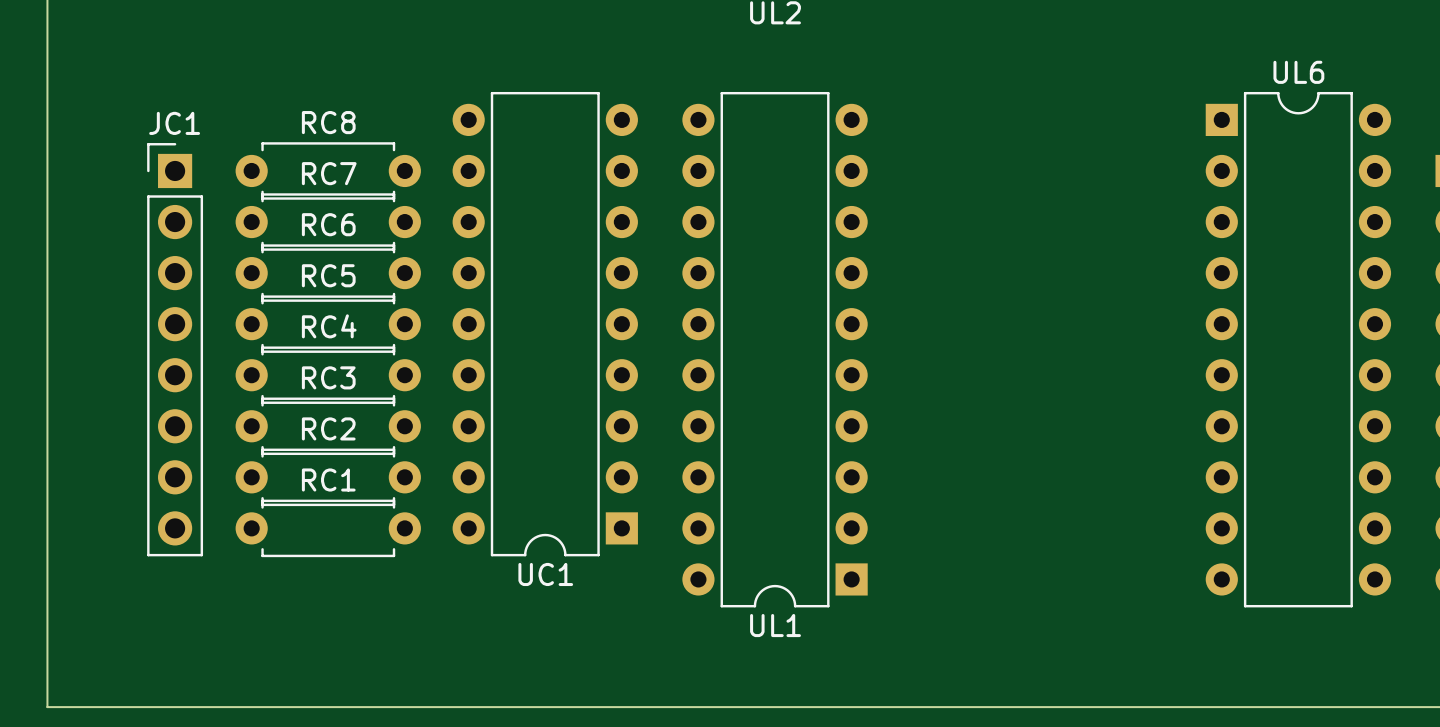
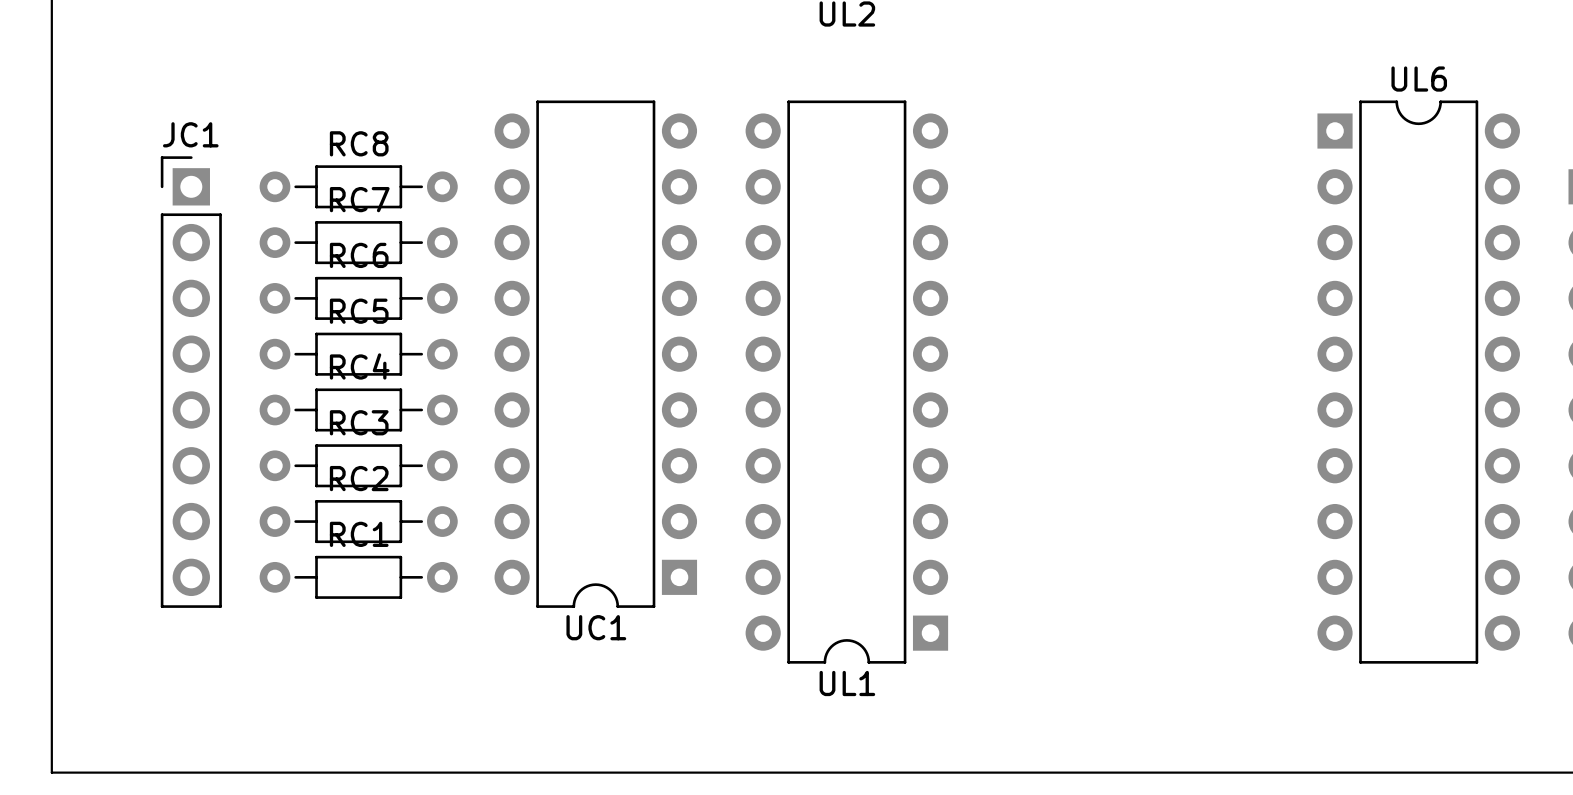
RC8 footprint: [235, 142, 421, 200] -> [259, 165, 458, 209]
RC7 footprint: [235, 193, 421, 251] -> [259, 221, 458, 265]
RC6 footprint: [235, 244, 421, 302] -> [259, 276, 458, 320]
RC5 footprint: [235, 295, 421, 353] -> [259, 332, 458, 376]
RC4 footprint: [235, 346, 421, 404] -> [259, 388, 458, 432]
RC3 footprint: [235, 397, 421, 456] -> [259, 444, 458, 488]
RC2 footprint: [235, 448, 421, 507] -> [259, 500, 458, 544]
RC1 footprint: [235, 499, 421, 558] -> [259, 555, 458, 599]

